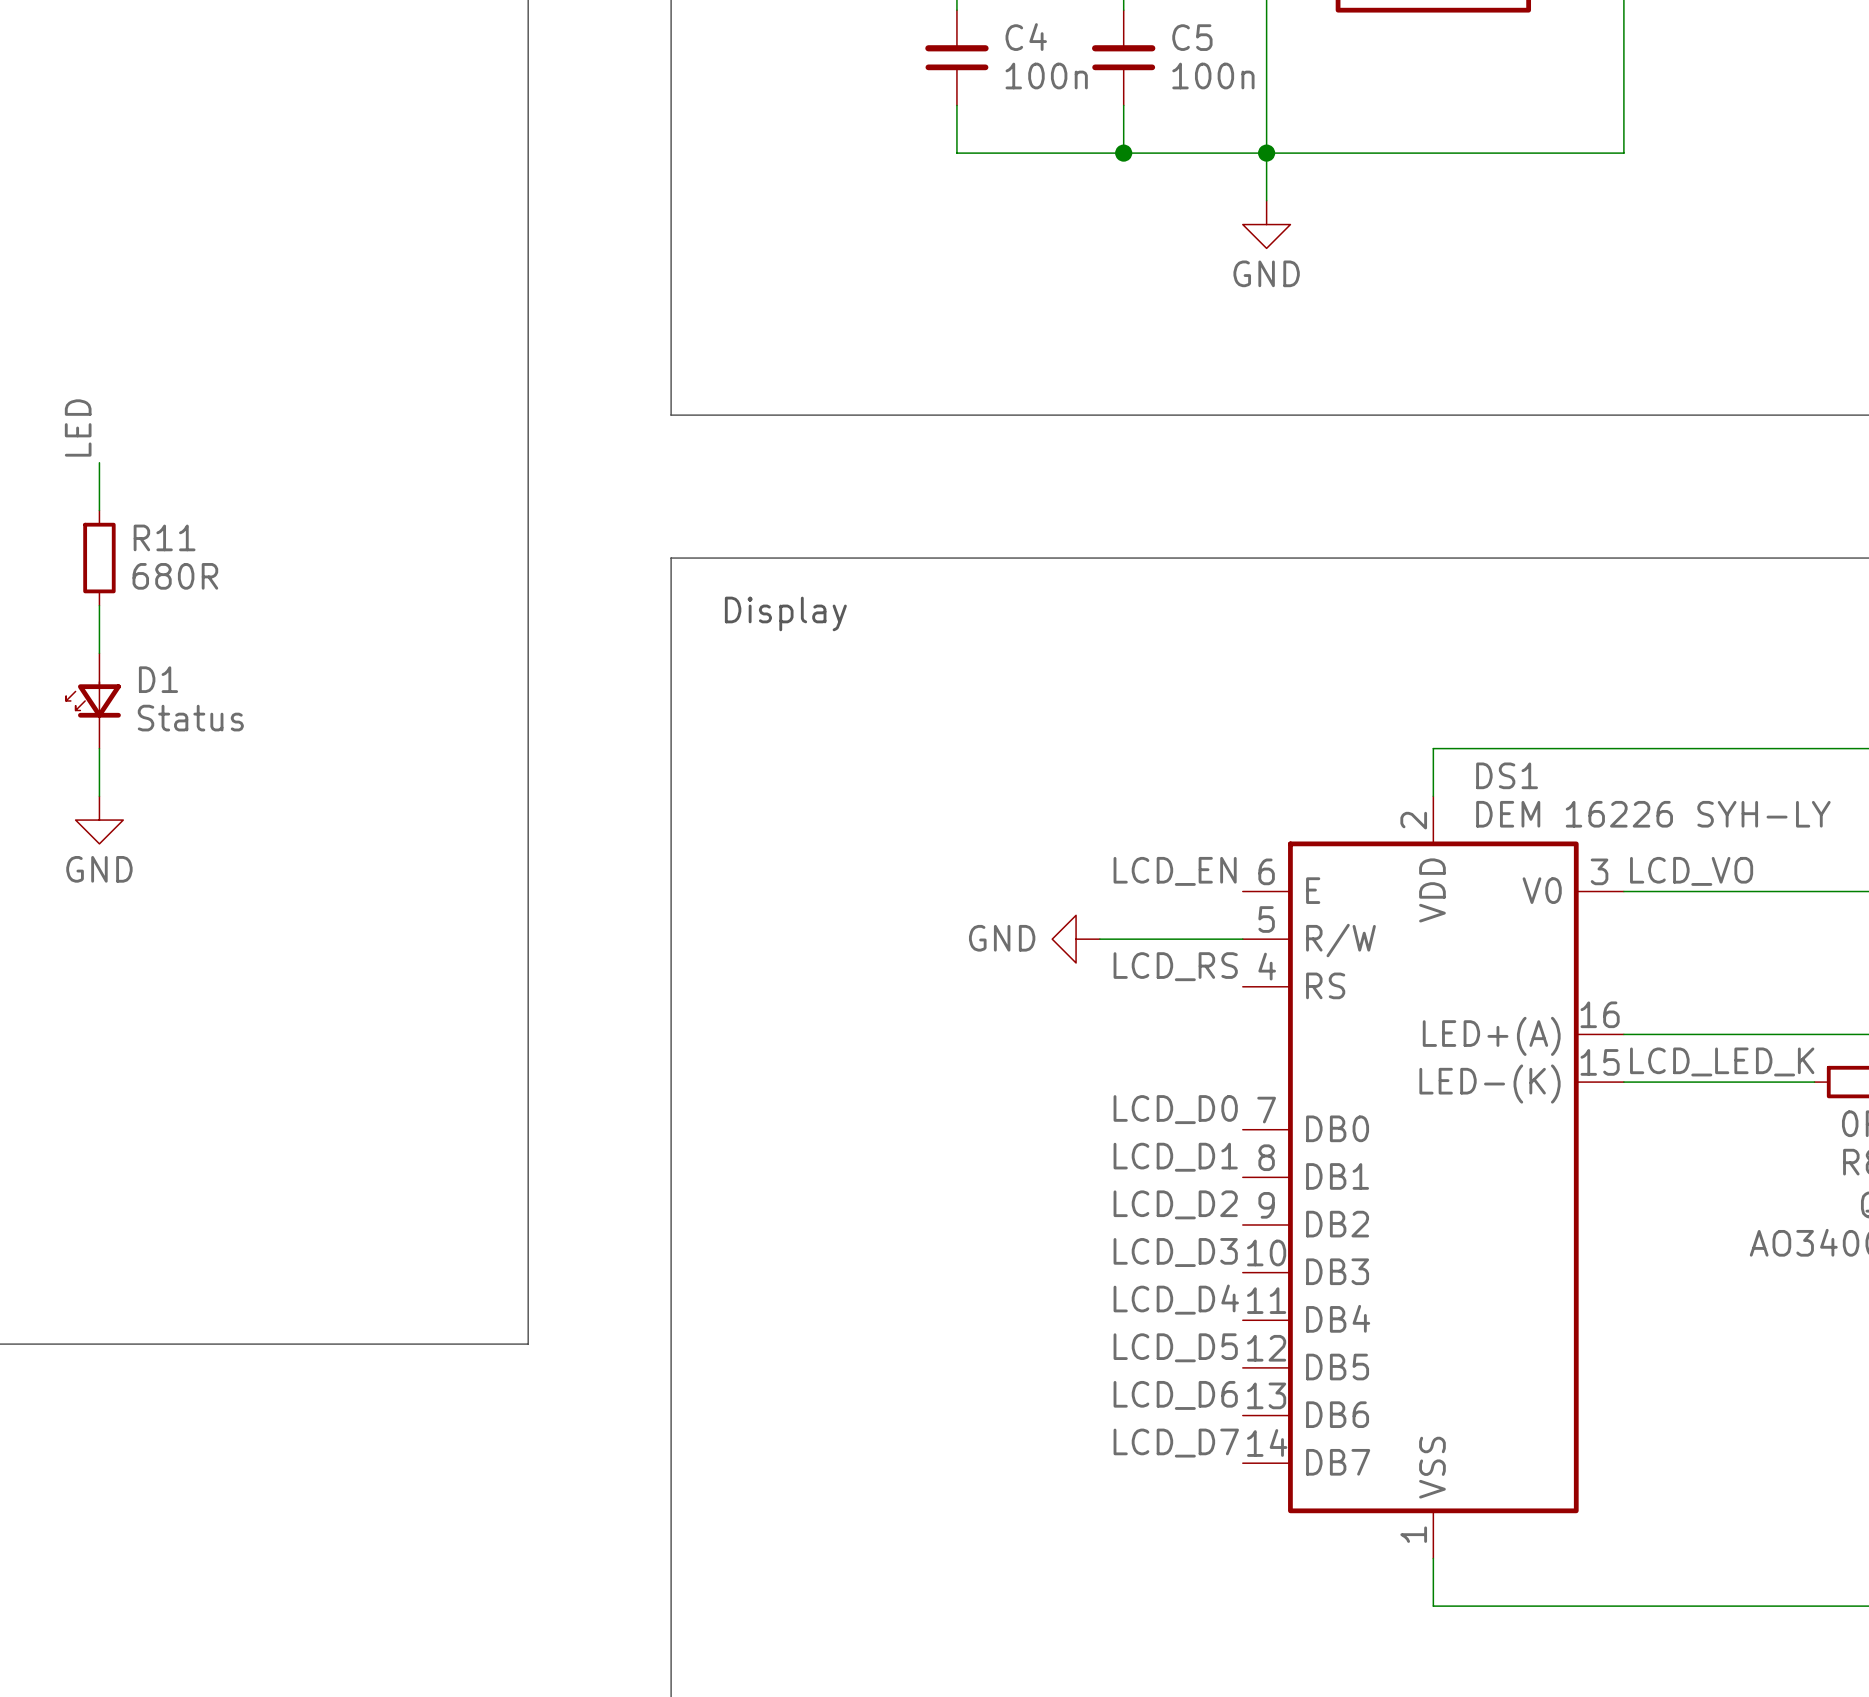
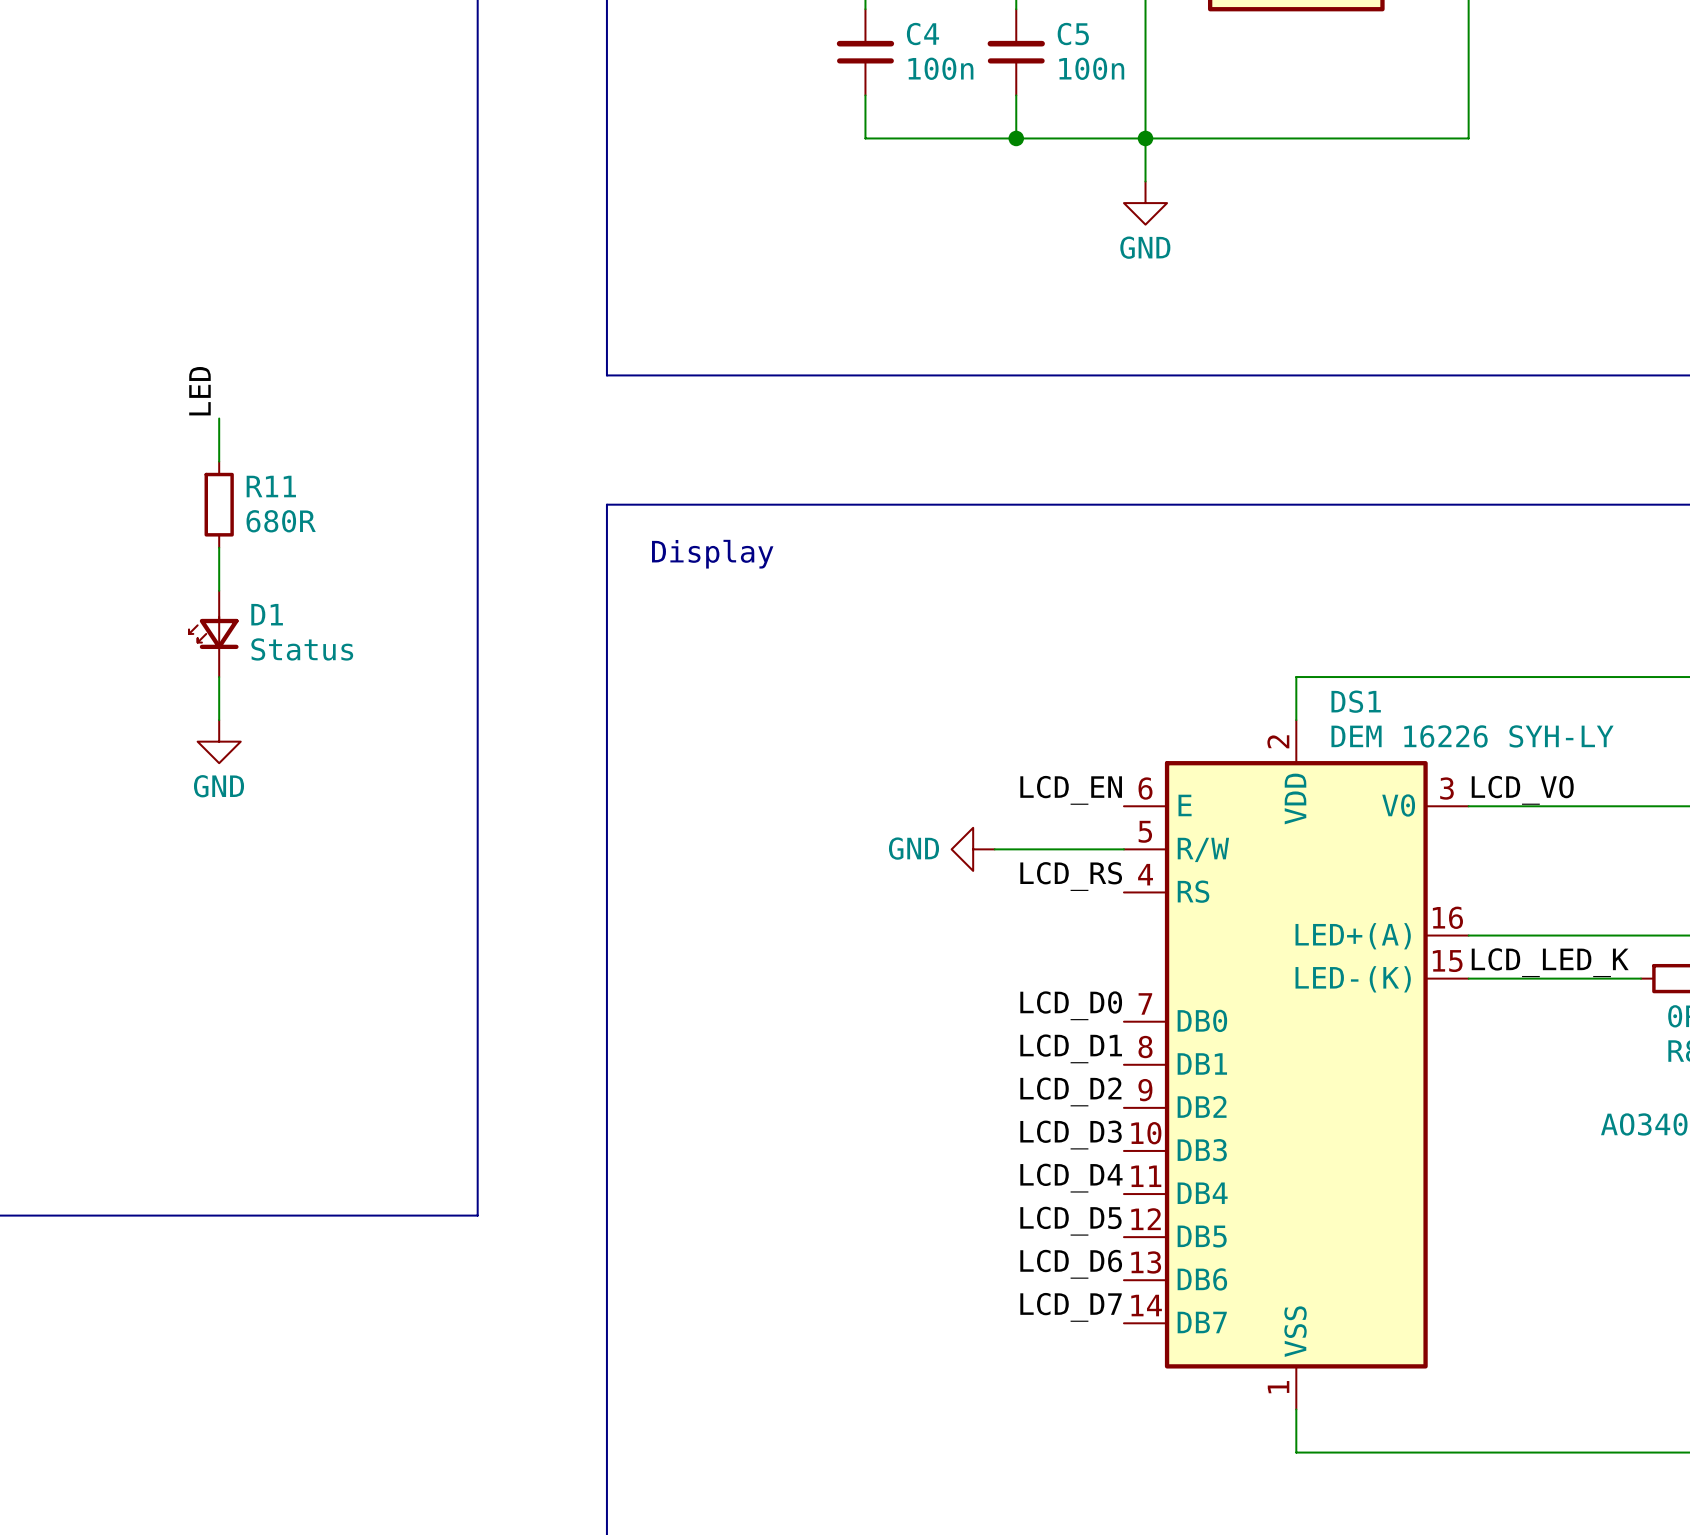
label position: LED (78, 427) -> LED (199, 391)
wire: (99, 462) (99, 510) -> (219, 418) (219, 461)
R11 position: (99, 558) -> (219, 504)
wire: (99, 605) (99, 653) -> (219, 547) (219, 590)
D1 position: (93, 700) -> (213, 633)
wire: (99, 748) (99, 796) -> (219, 677) (219, 720)
power symbol position: GND (99, 820) -> GND (219, 741)

